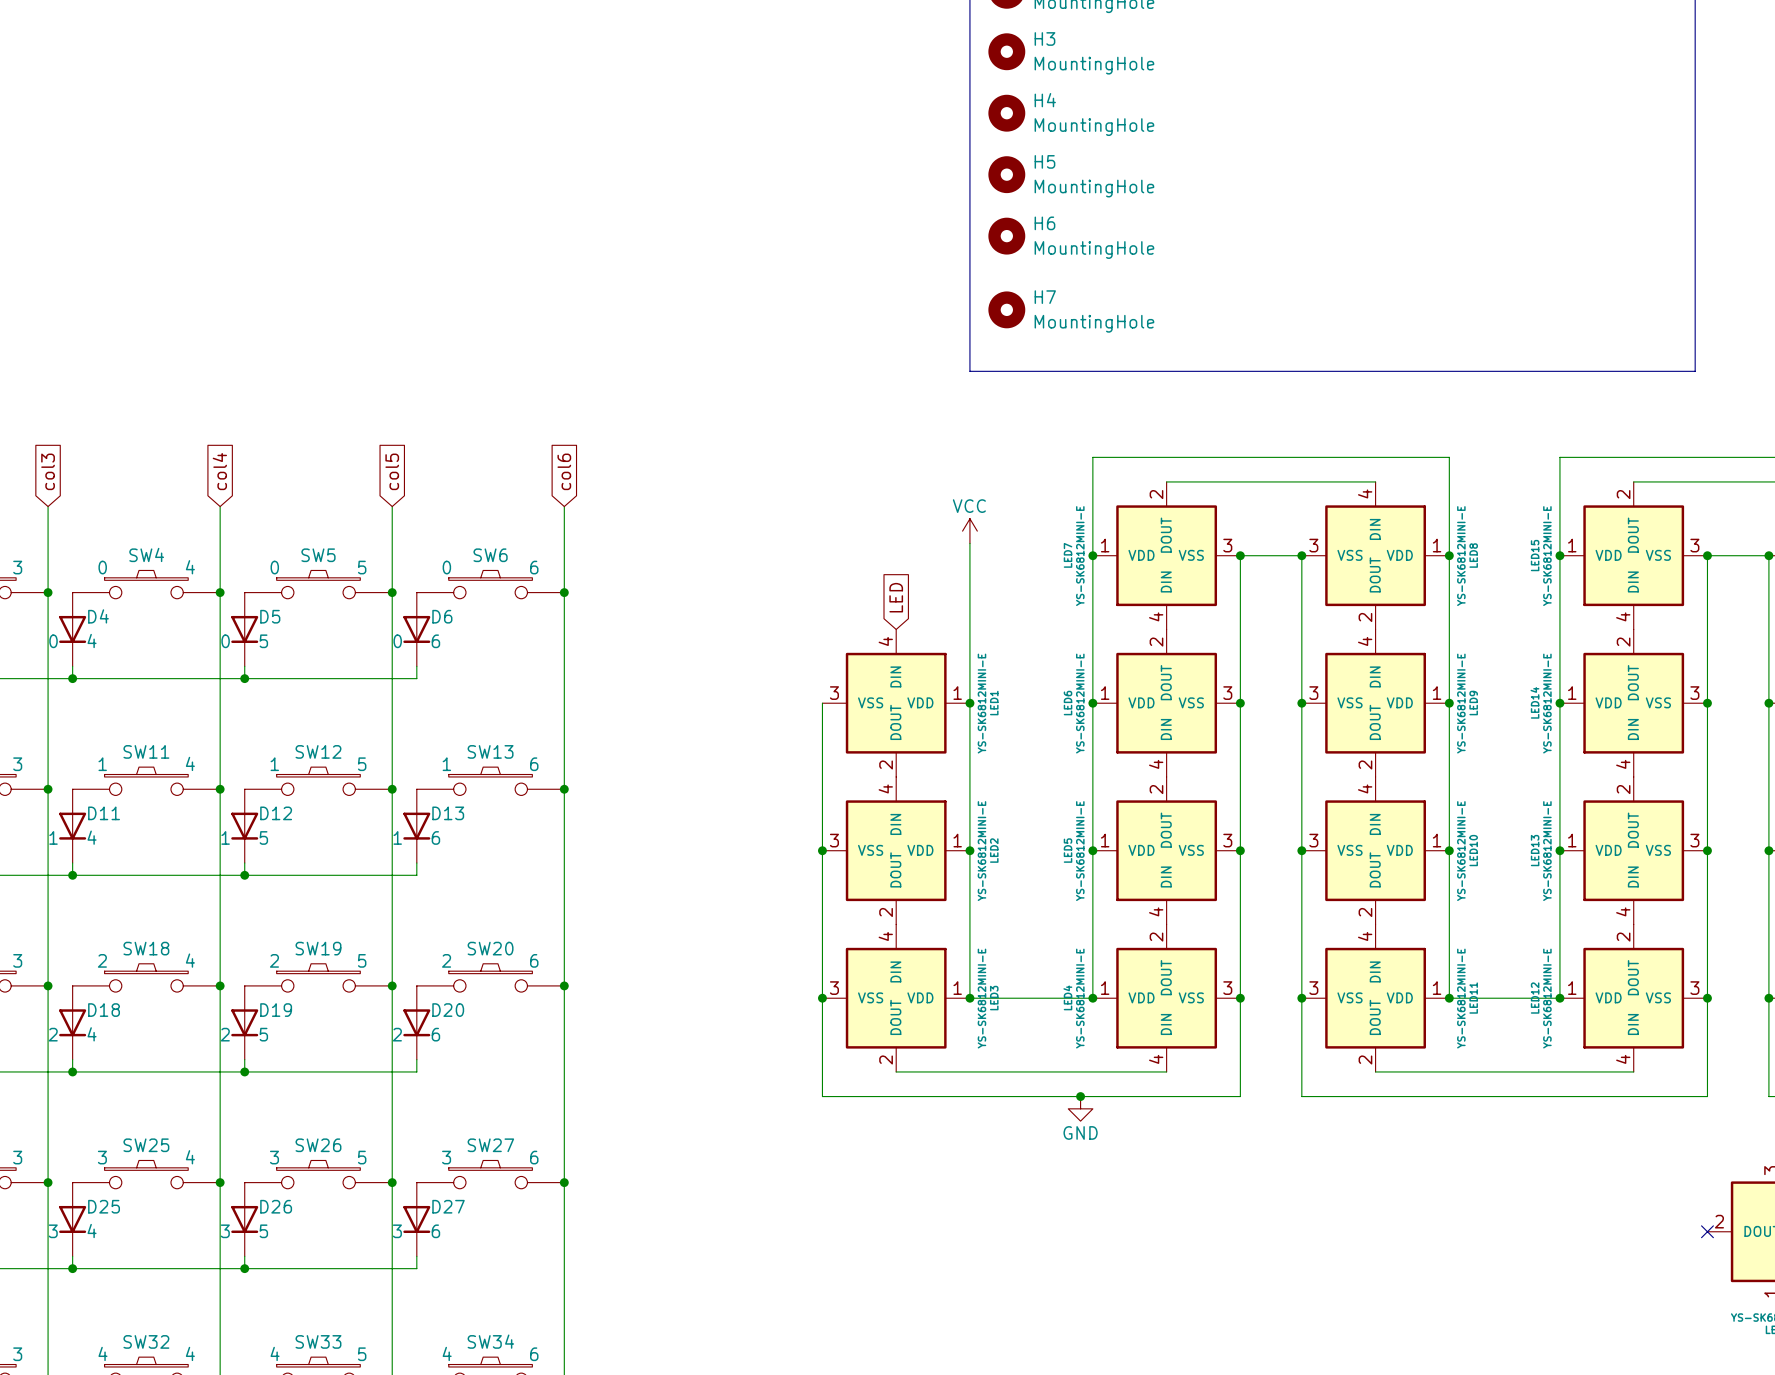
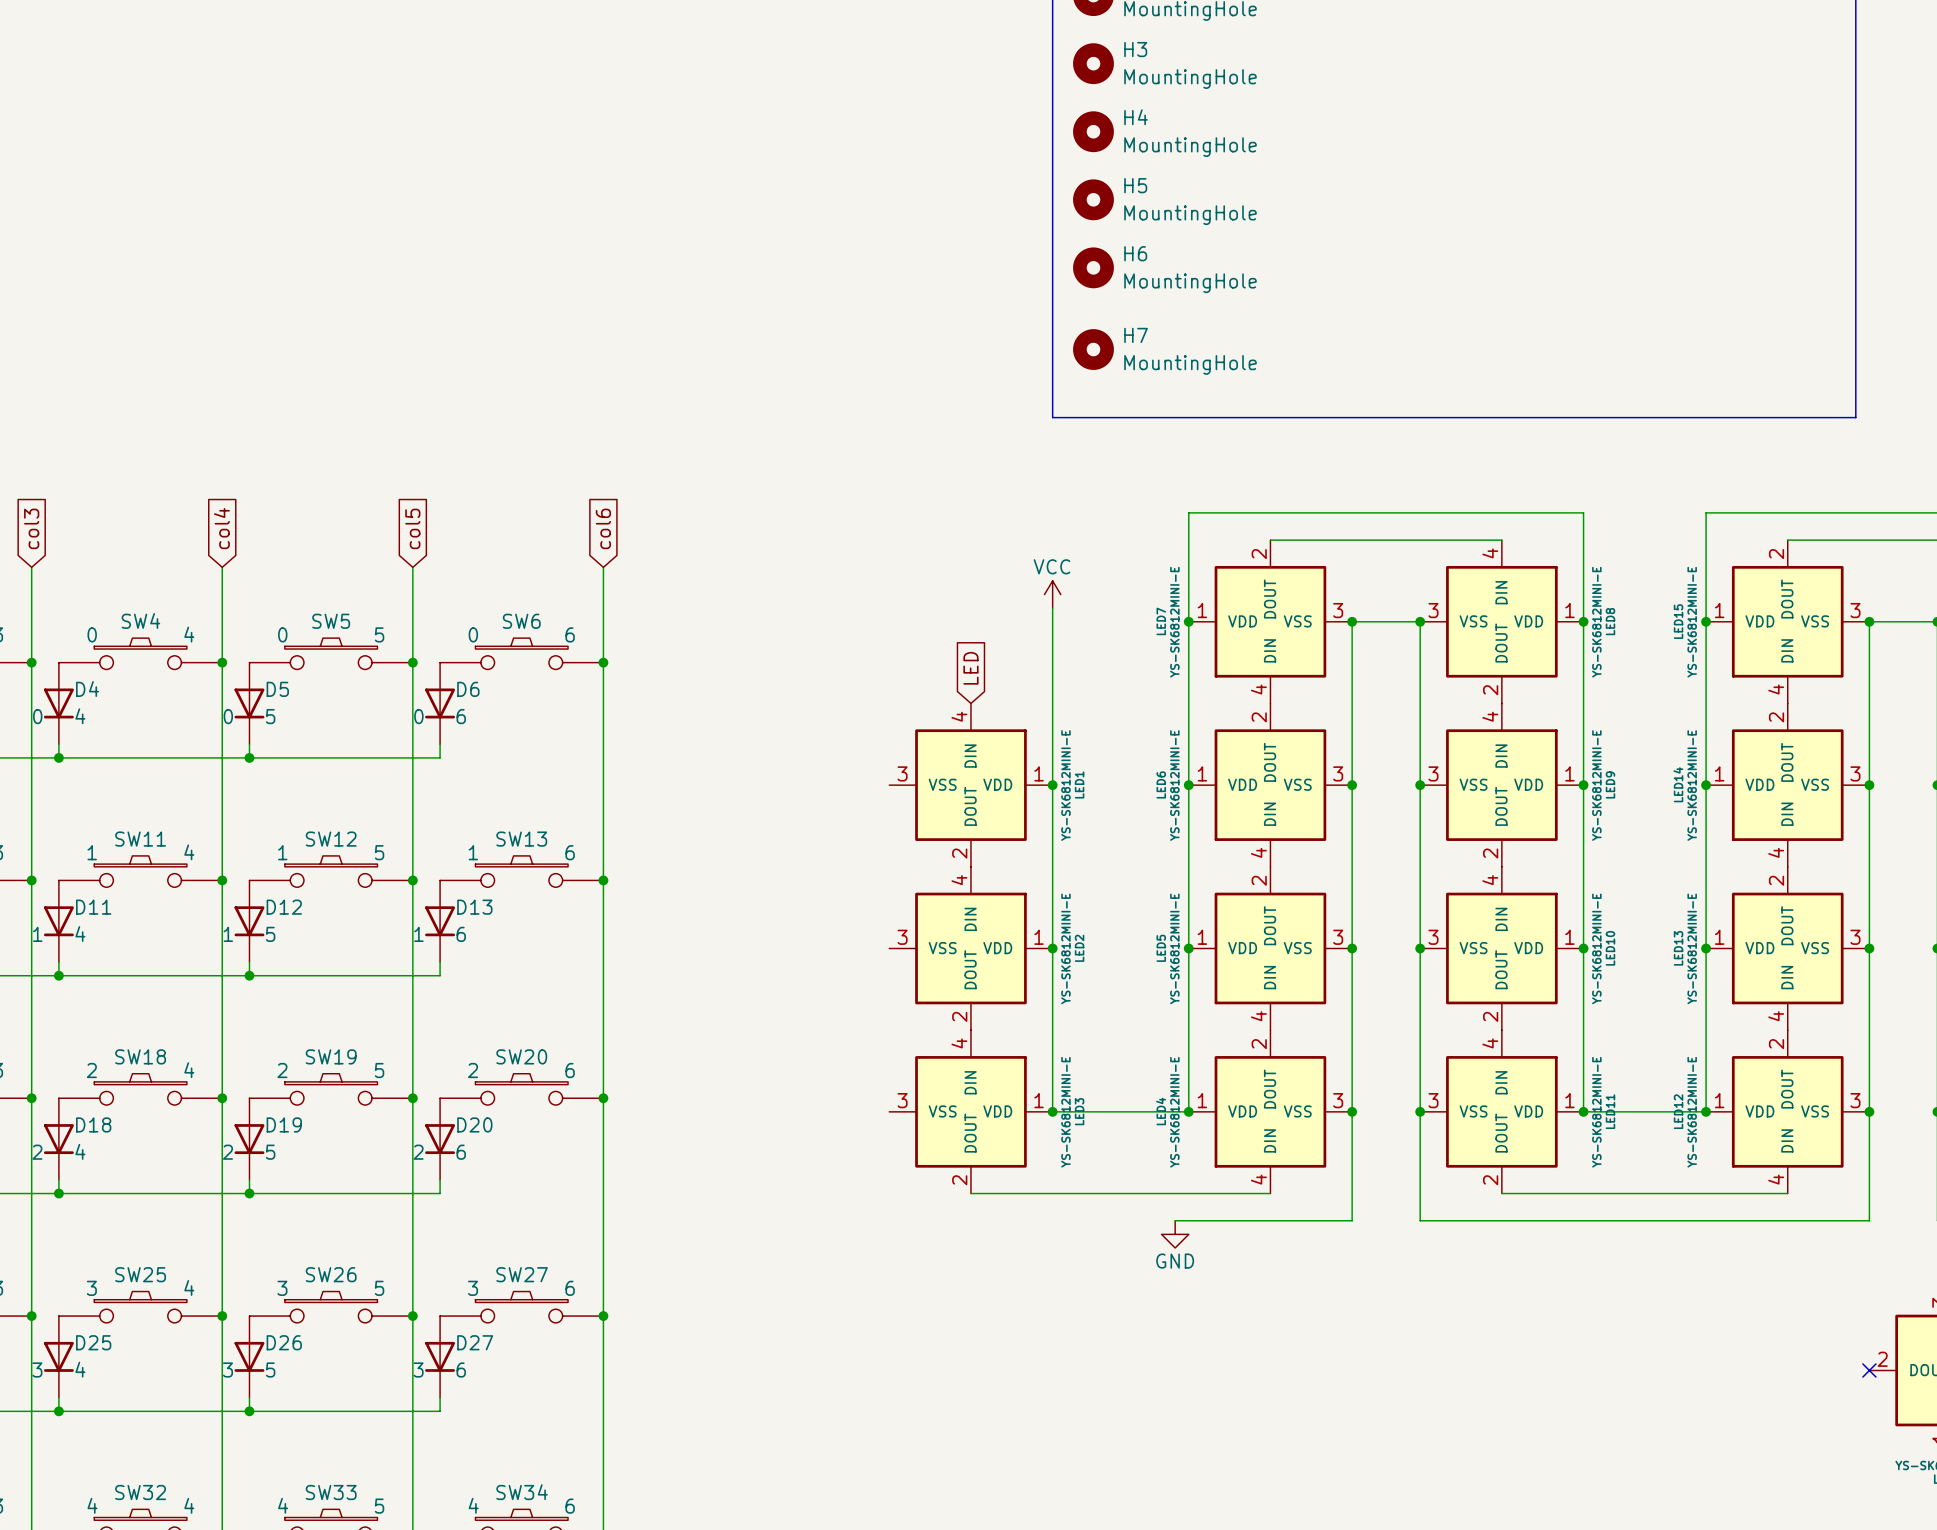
wire: (822, 703) (822, 1096) (1080, 1096) -> none
junction: (822, 850) -> none
junction: (822, 998) -> none
junction: (1080, 1096) -> none

